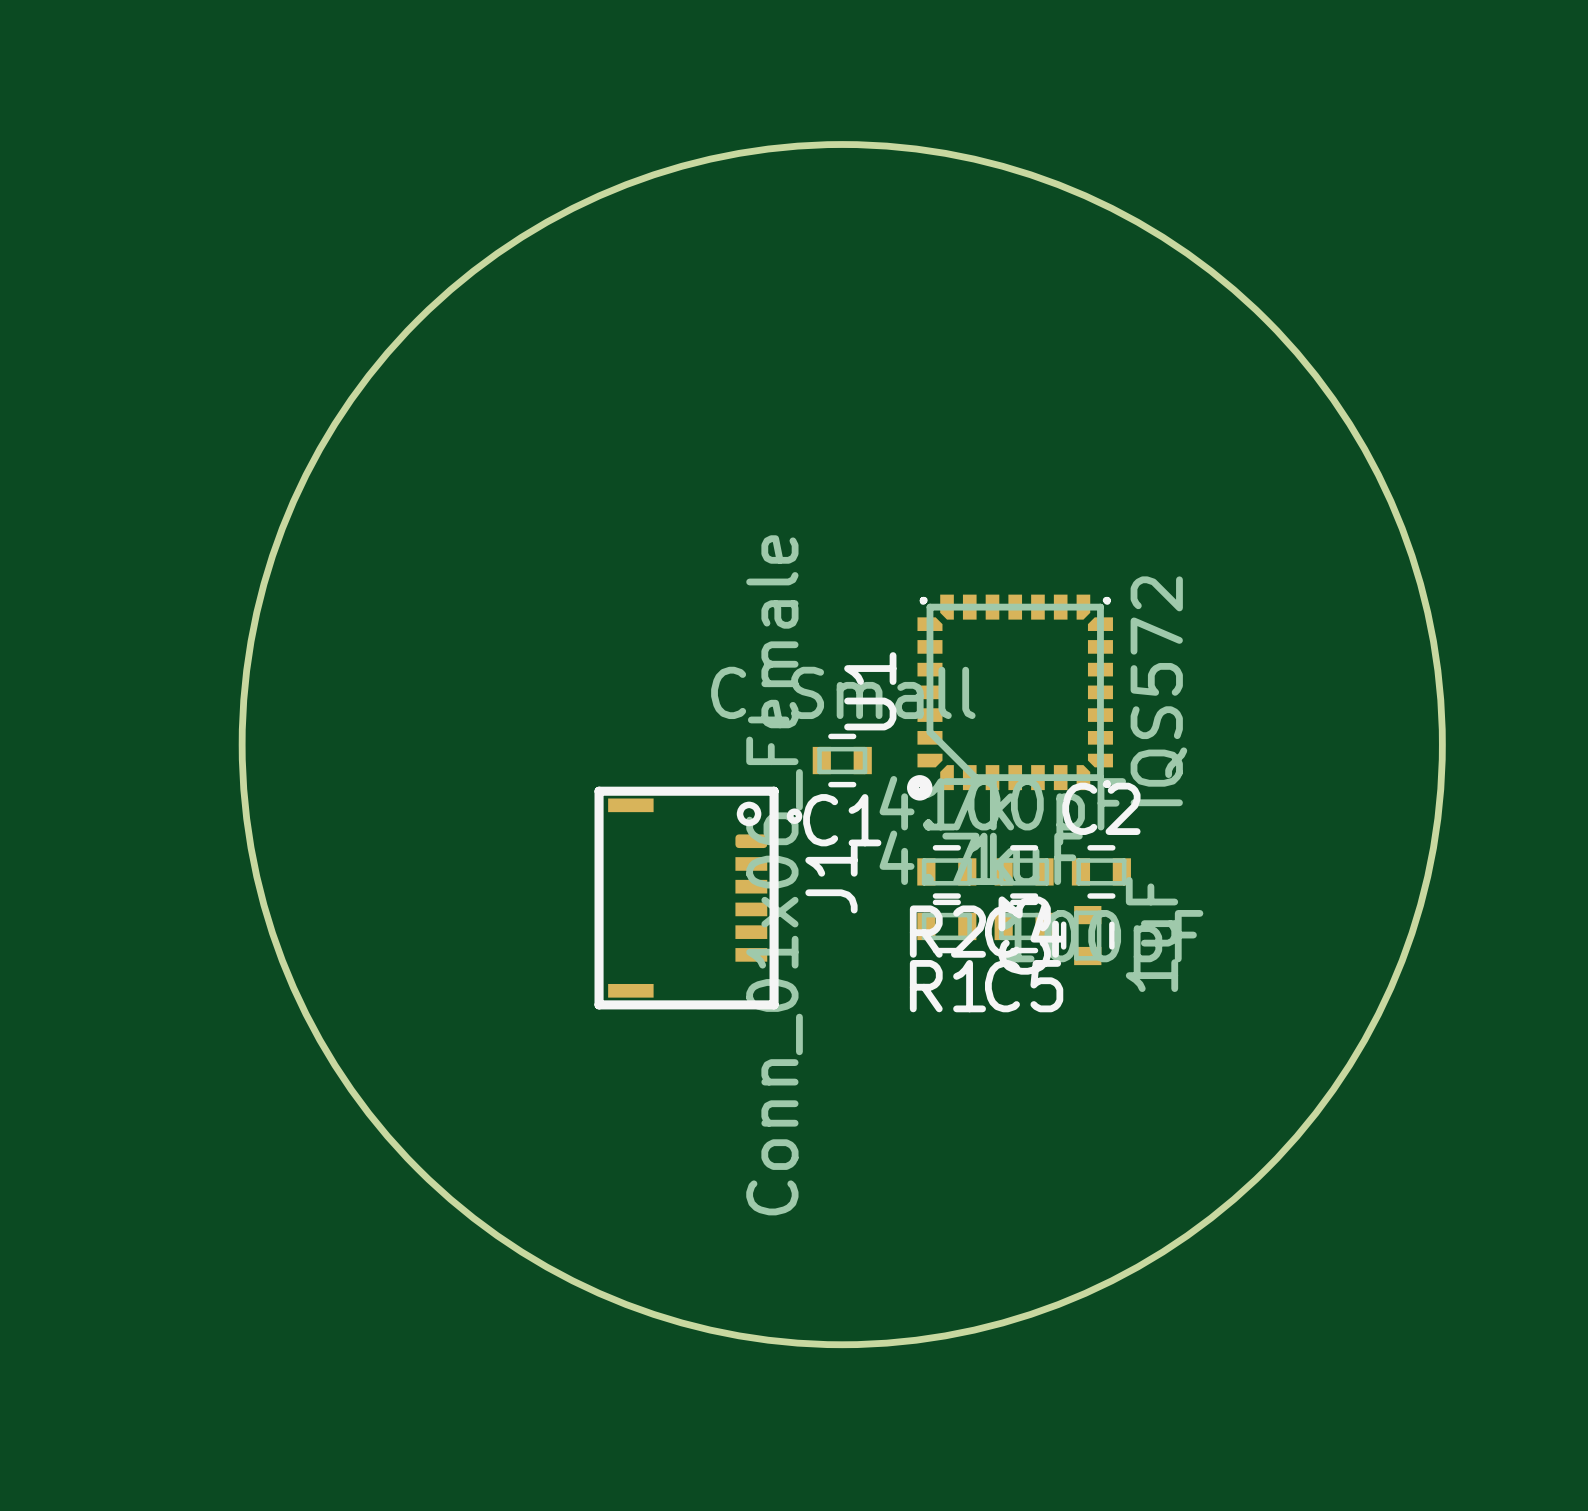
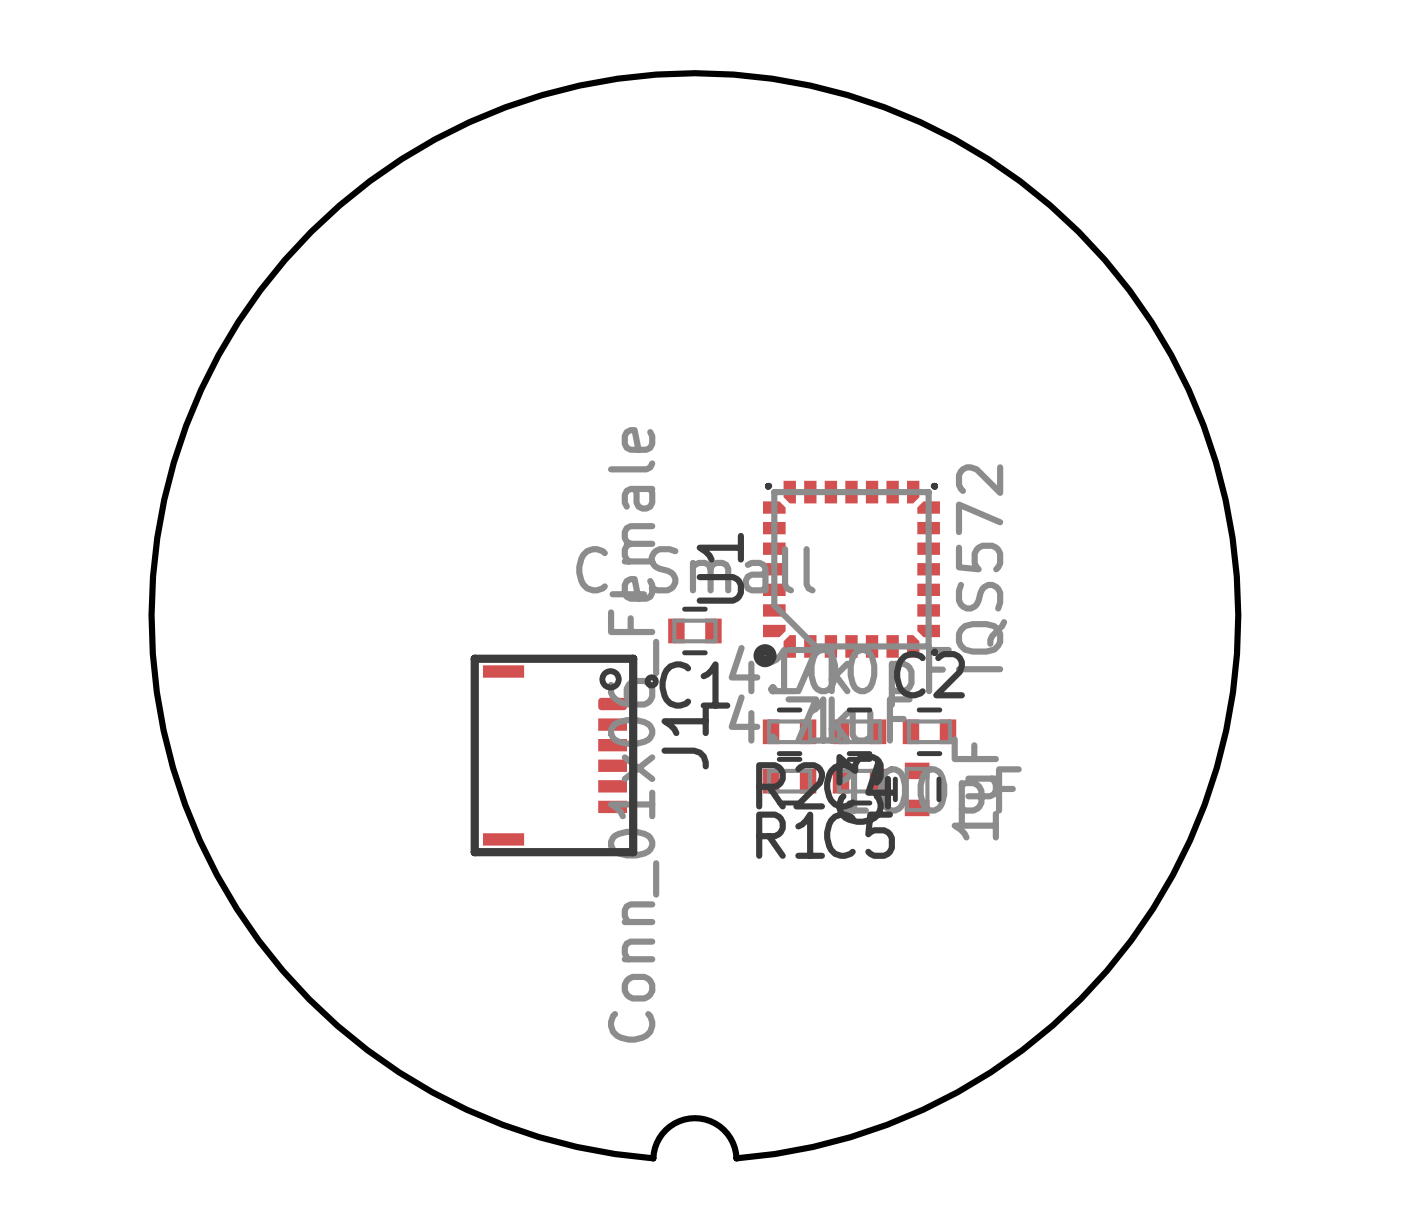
round board edge: [238, 141, 1446, 1349] -> none
board edge: none -> (653, 1158) (656, 1142) (662, 1133) (674, 1123) (689, 1118) (705, 1119) (719, 1126) (732, 1142) (736, 1158) (813, 1146) (850, 1137) (922, 1109) (957, 1092) (1022, 1050) (1052, 1025) (1080, 999) (1131, 940) (1172, 875) (1189, 840) (1204, 804) (1226, 730) (1237, 653) (1238, 615) (1232, 537) (1215, 462) (1188, 389) (1171, 355) (1151, 322) (1105, 260) (1050, 205) (1020, 181) (988, 159) (920, 122) (847, 95) (772, 78) (733, 74) (694, 73) (617, 78) (542, 95) (505, 107) (434, 139) (401, 159) (339, 205) (284, 260) (260, 290) (238, 322) (201, 389) (173, 462) (164, 499) (153, 576) (152, 653) (163, 730) (173, 768) (185, 804) (217, 875) (236, 908) (282, 970) (337, 1025) (367, 1050) (399, 1072) (466, 1109) (502, 1124) (576, 1146) (653, 1158)

